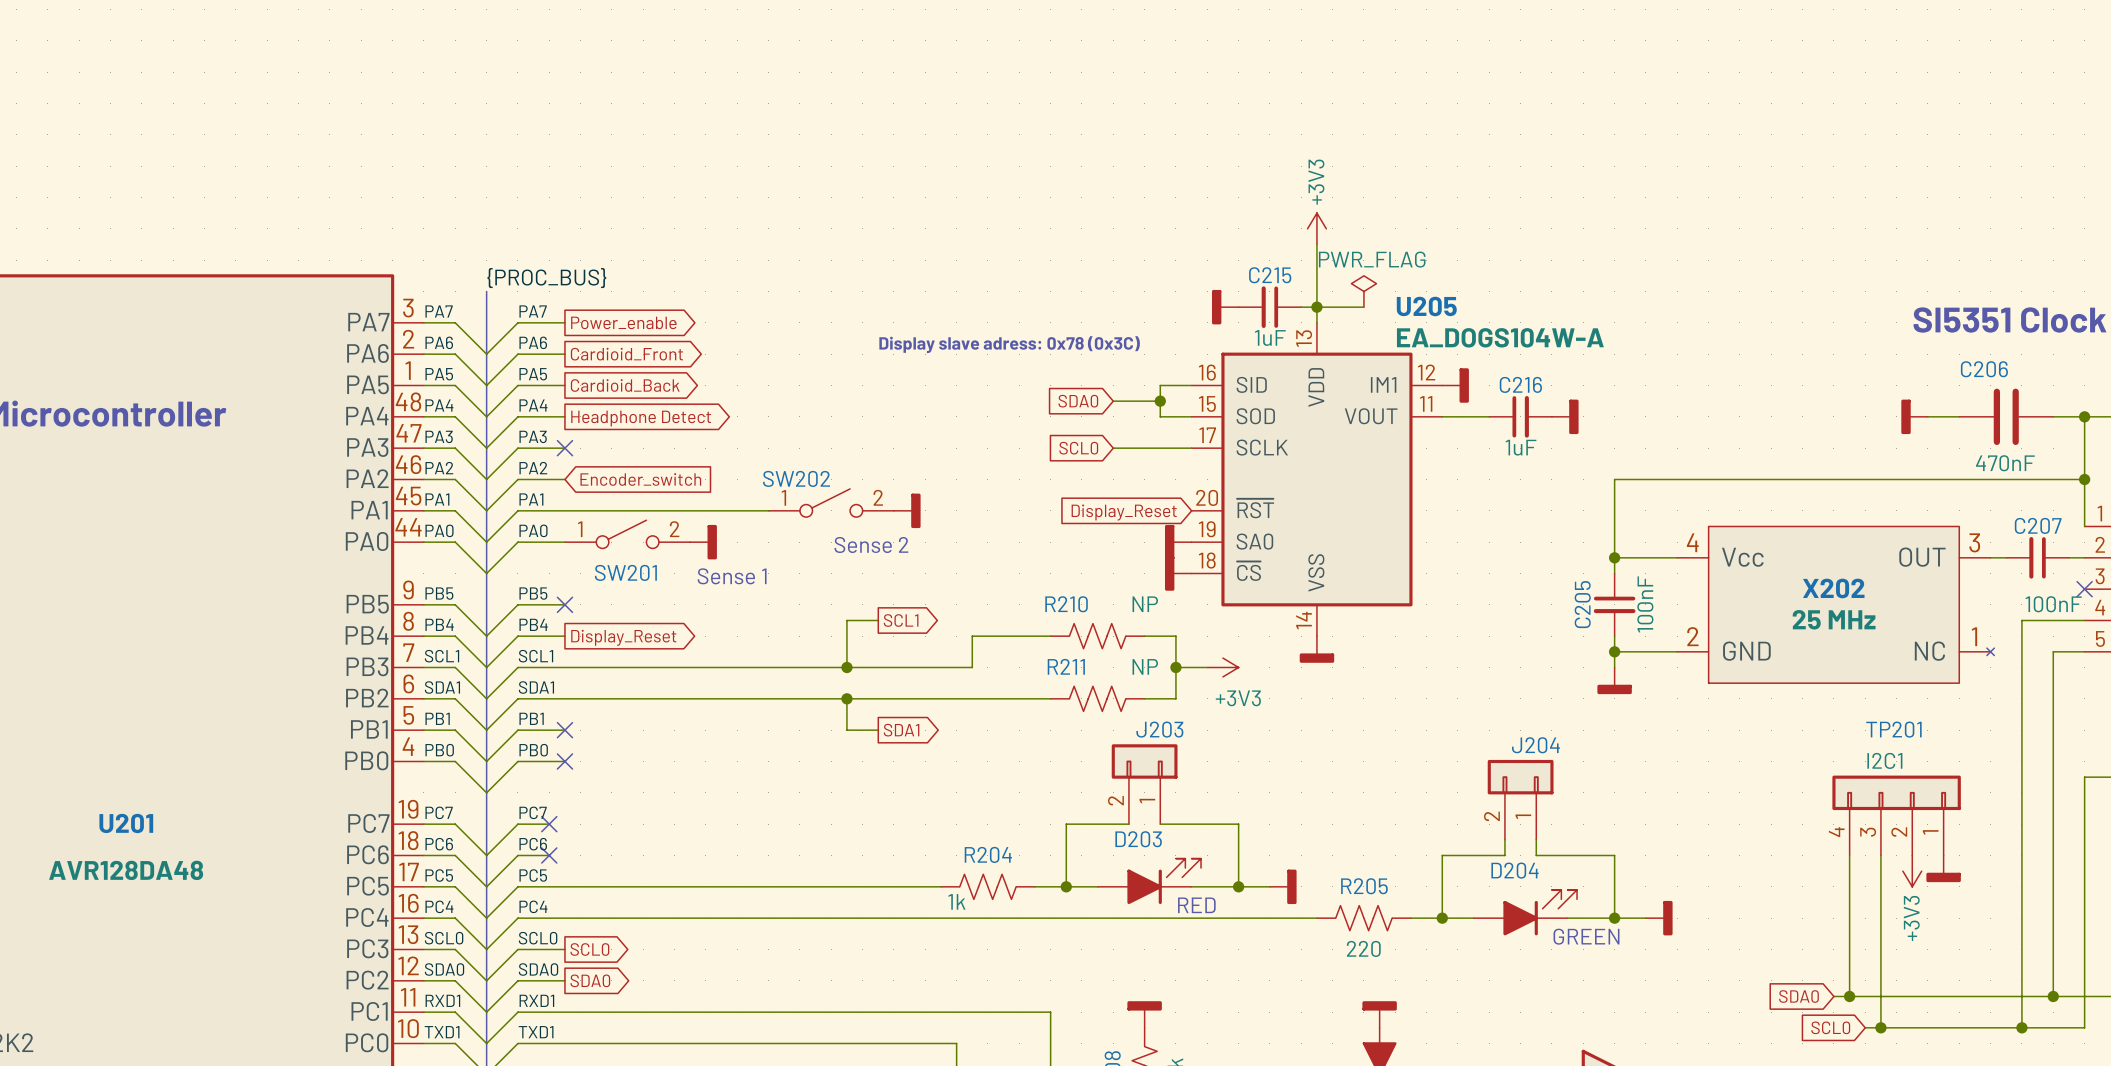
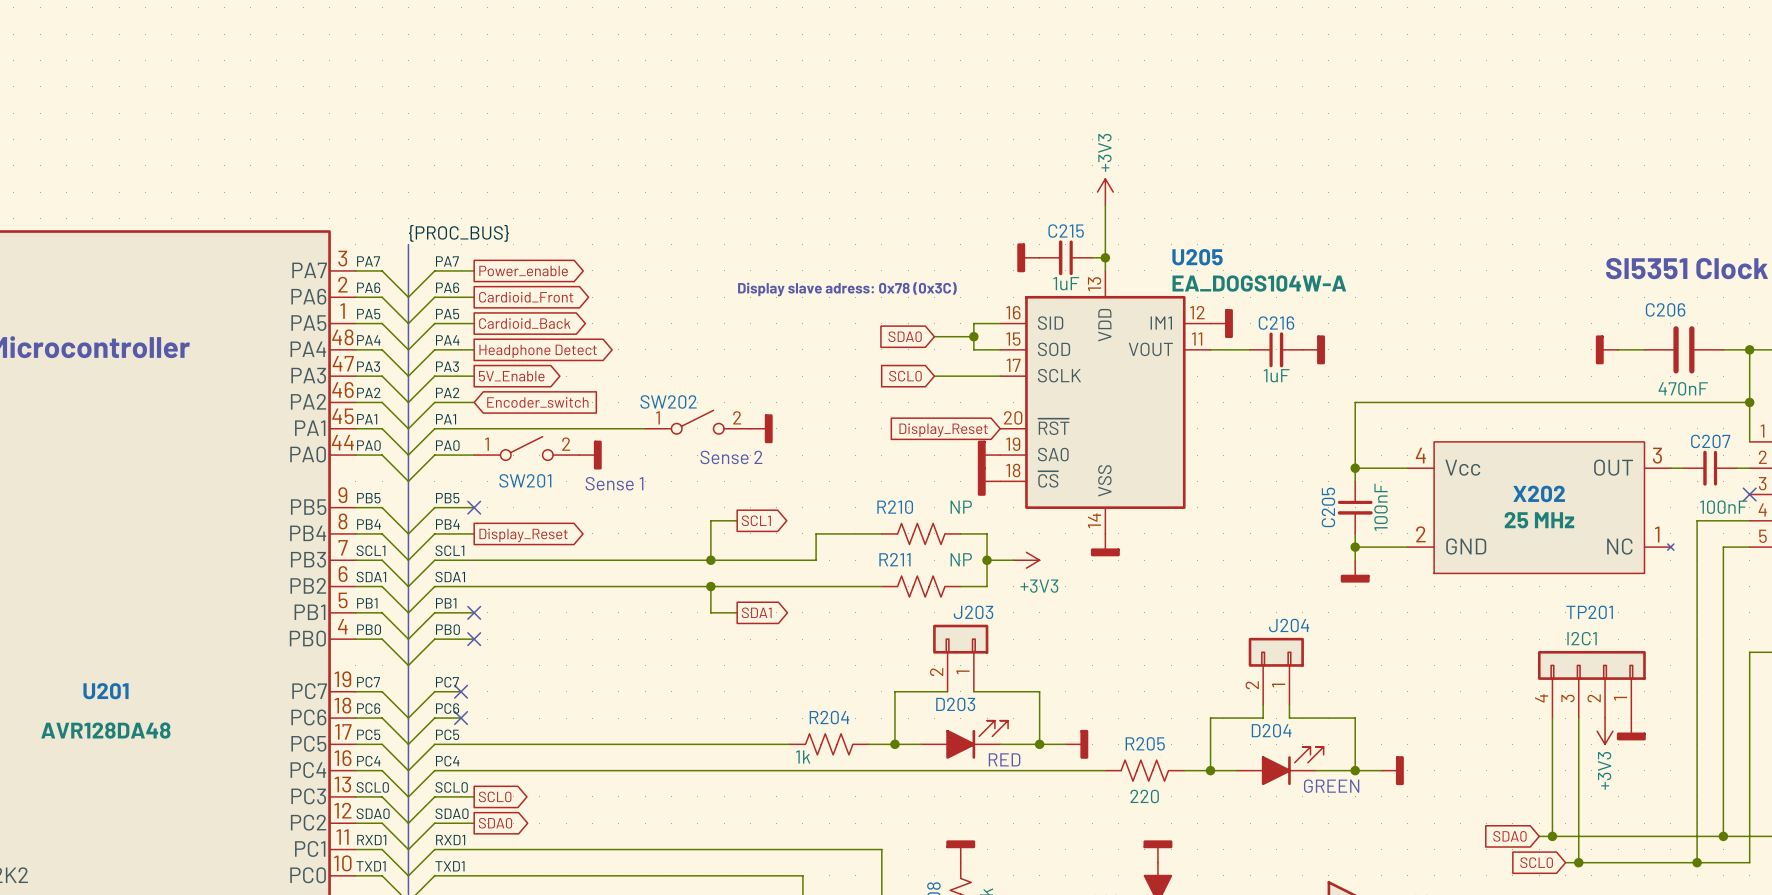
power symbol: PWR_FLAG (1363, 291) -> none
wire: (1316, 307) (1363, 307) -> none
no-connect mark: (564, 448) -> none
global label: none -> 5V_Enable (511, 376)

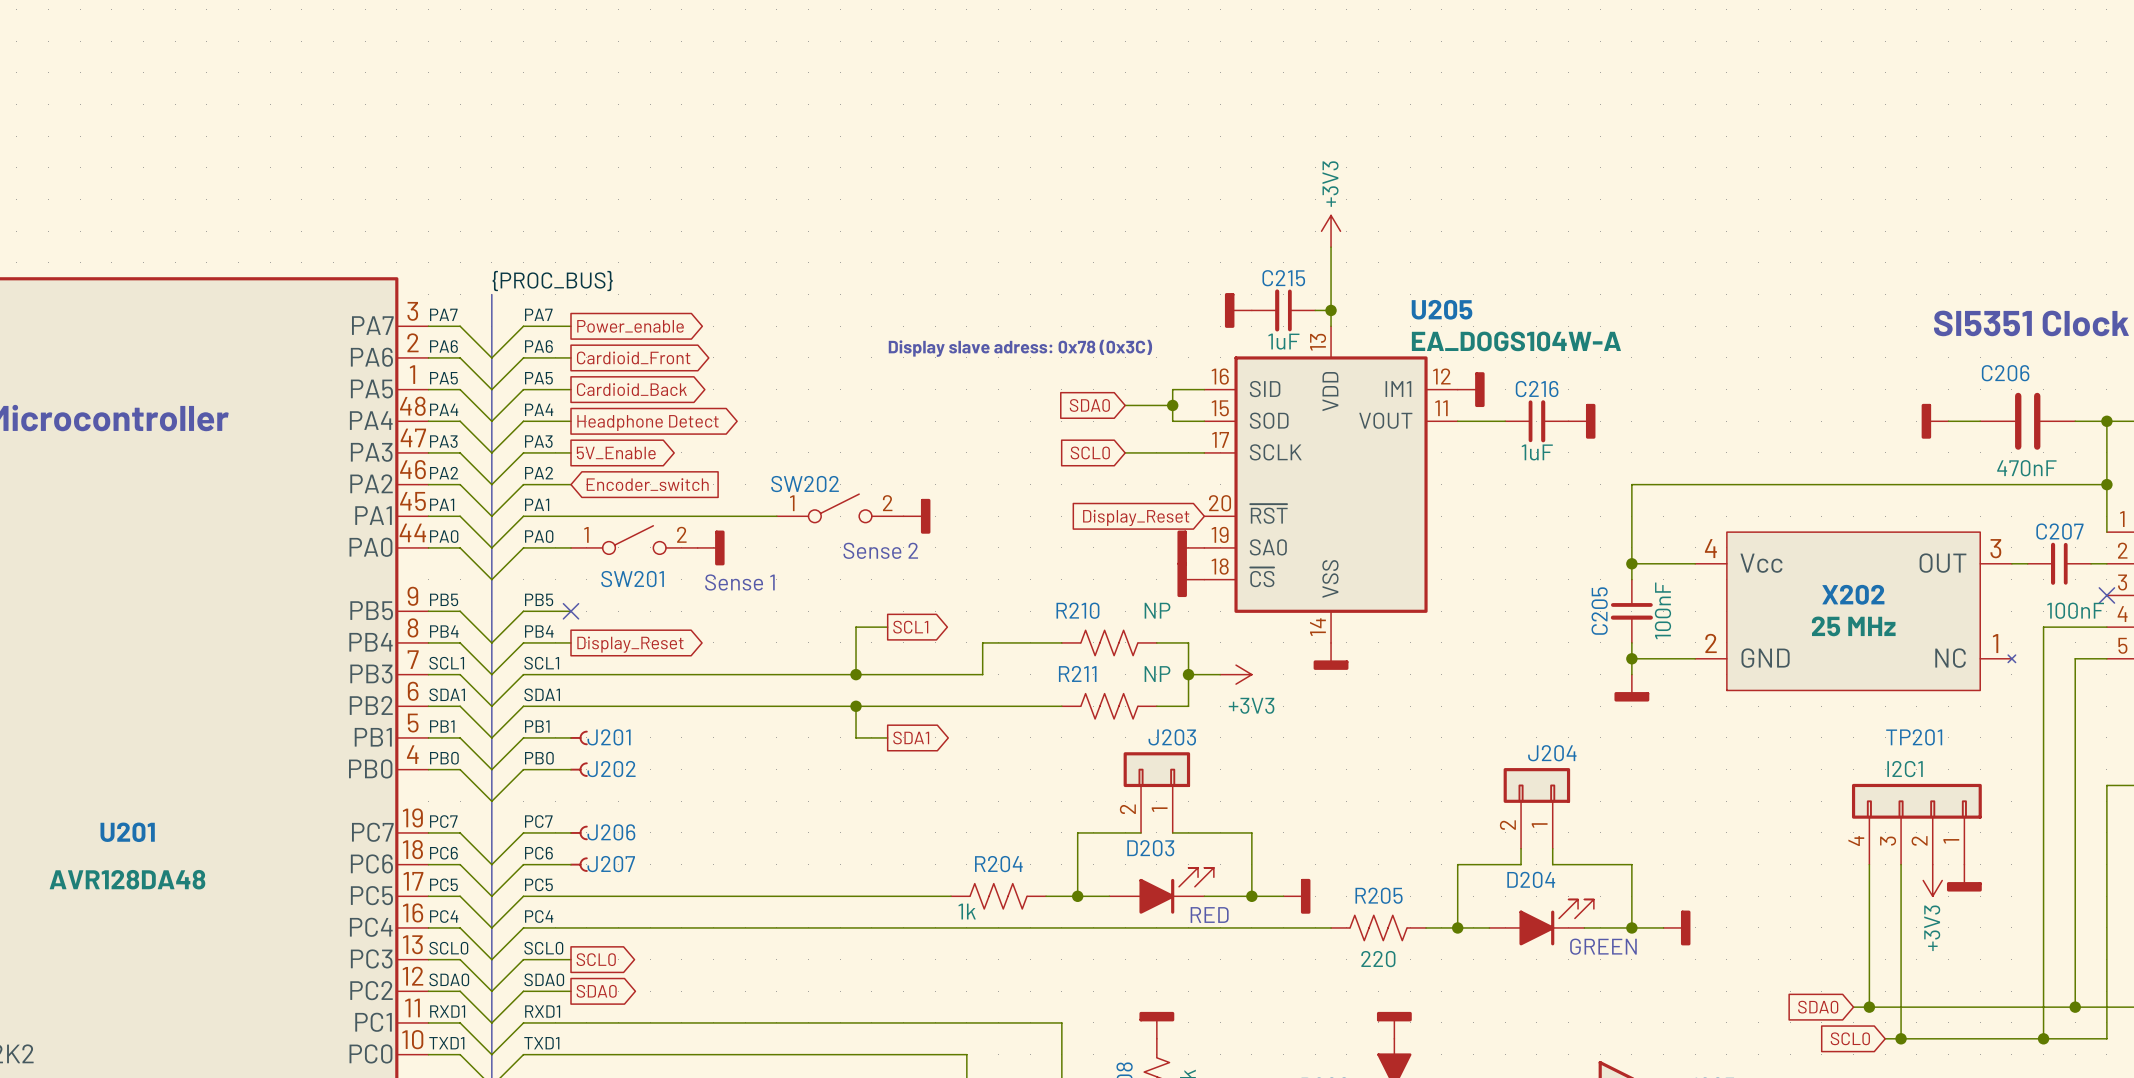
no-connect mark: (474, 612) -> none
J201: none -> (578, 737)
no-connect mark: (474, 639) -> none
J202: none -> (578, 769)
wire: none -> (555, 832) (571, 832)
no-connect mark: (461, 691) -> none
J206: none -> (578, 832)
wire: none -> (555, 864) (571, 864)
no-connect mark: (461, 718) -> none
J207: none -> (578, 864)

